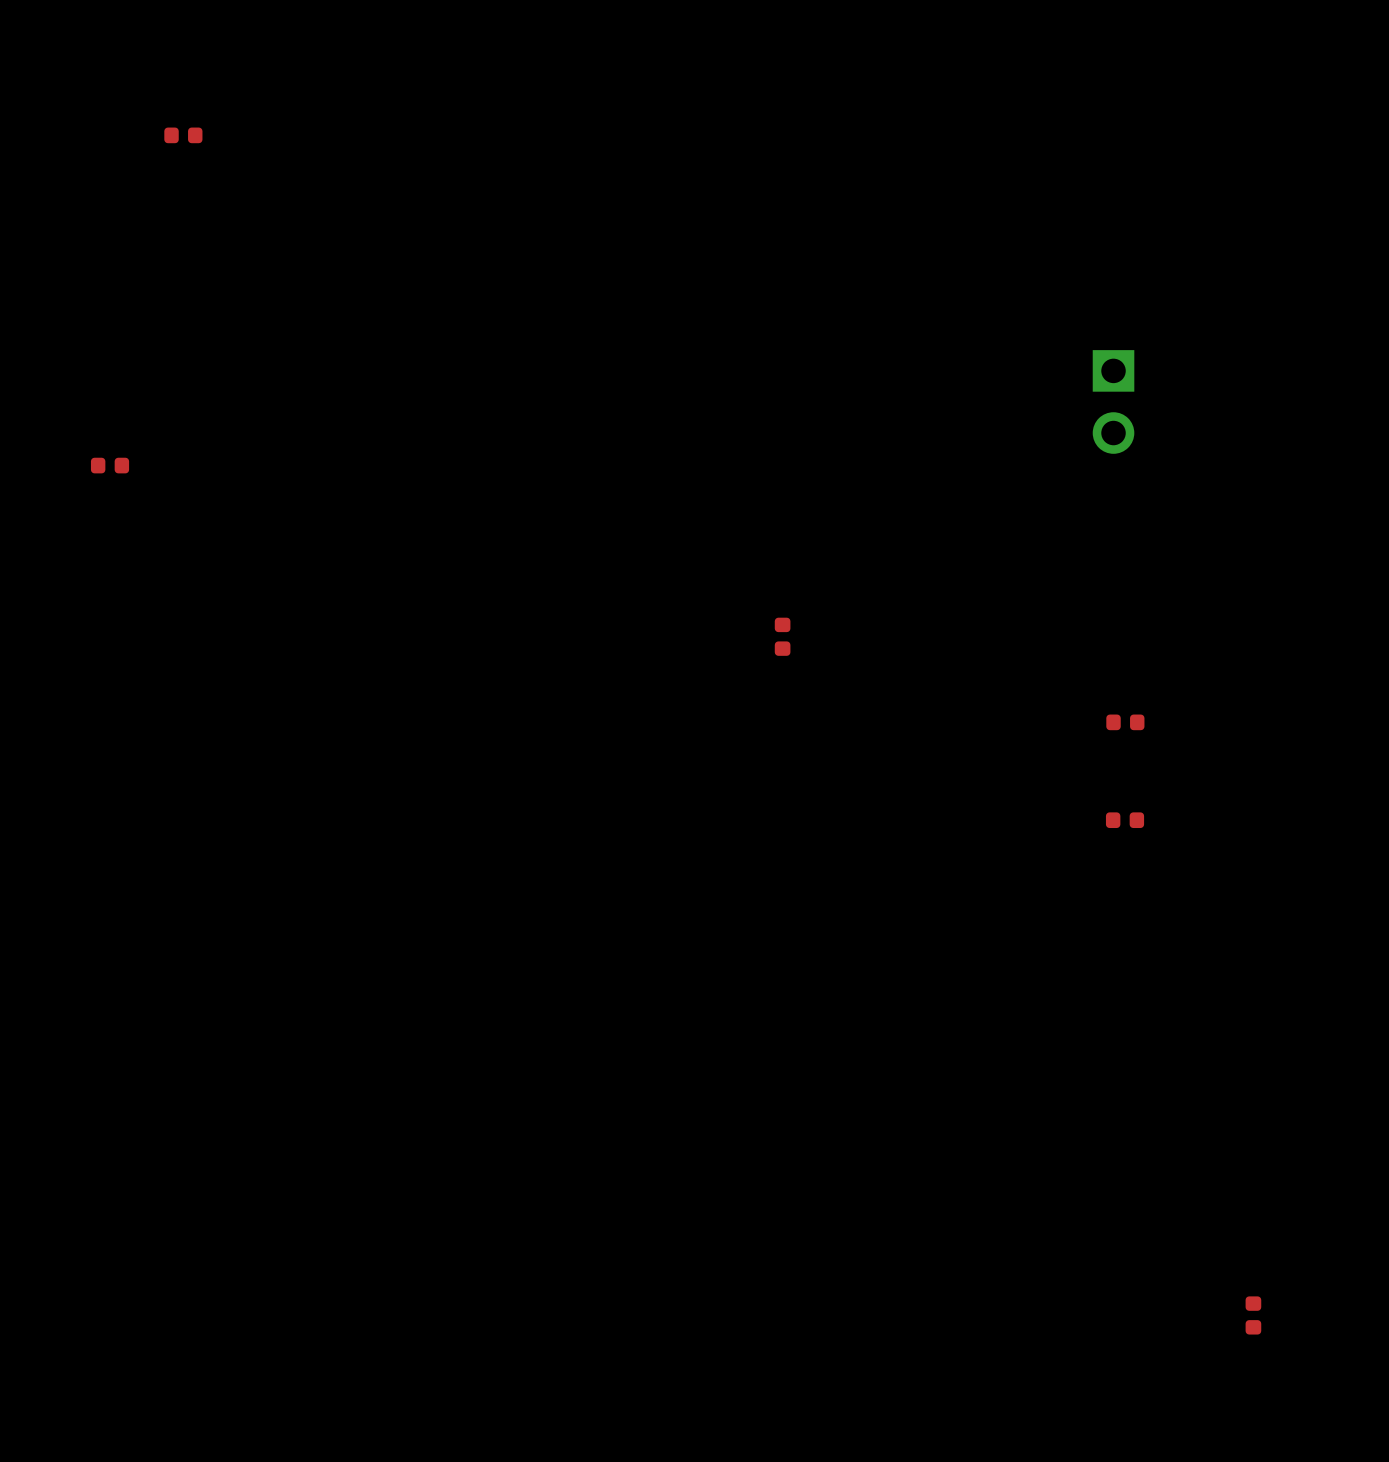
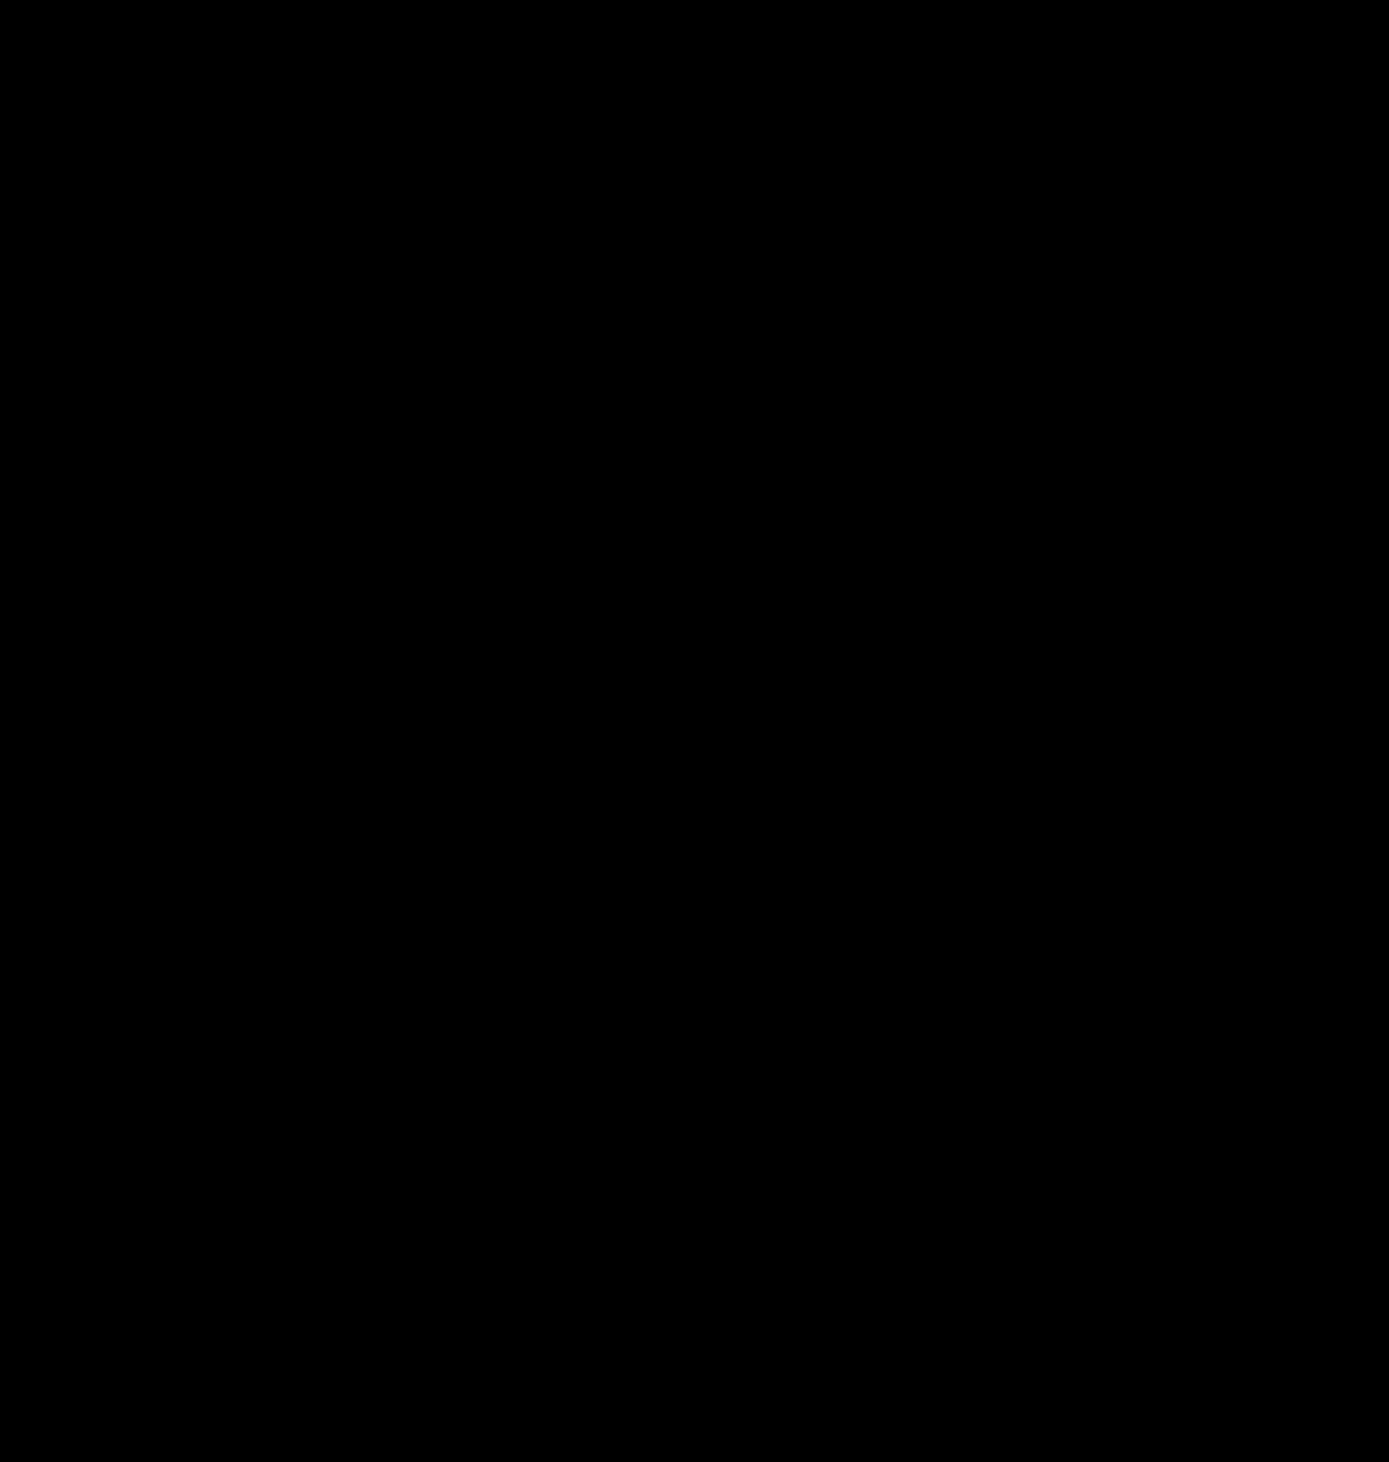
part: (183, 135) -> none
part: (1113, 401) -> none
part: (110, 465) -> none
part: (782, 636) -> none
part: (1125, 722) -> none
part: (1125, 820) -> none
part: (1253, 1315) -> none

